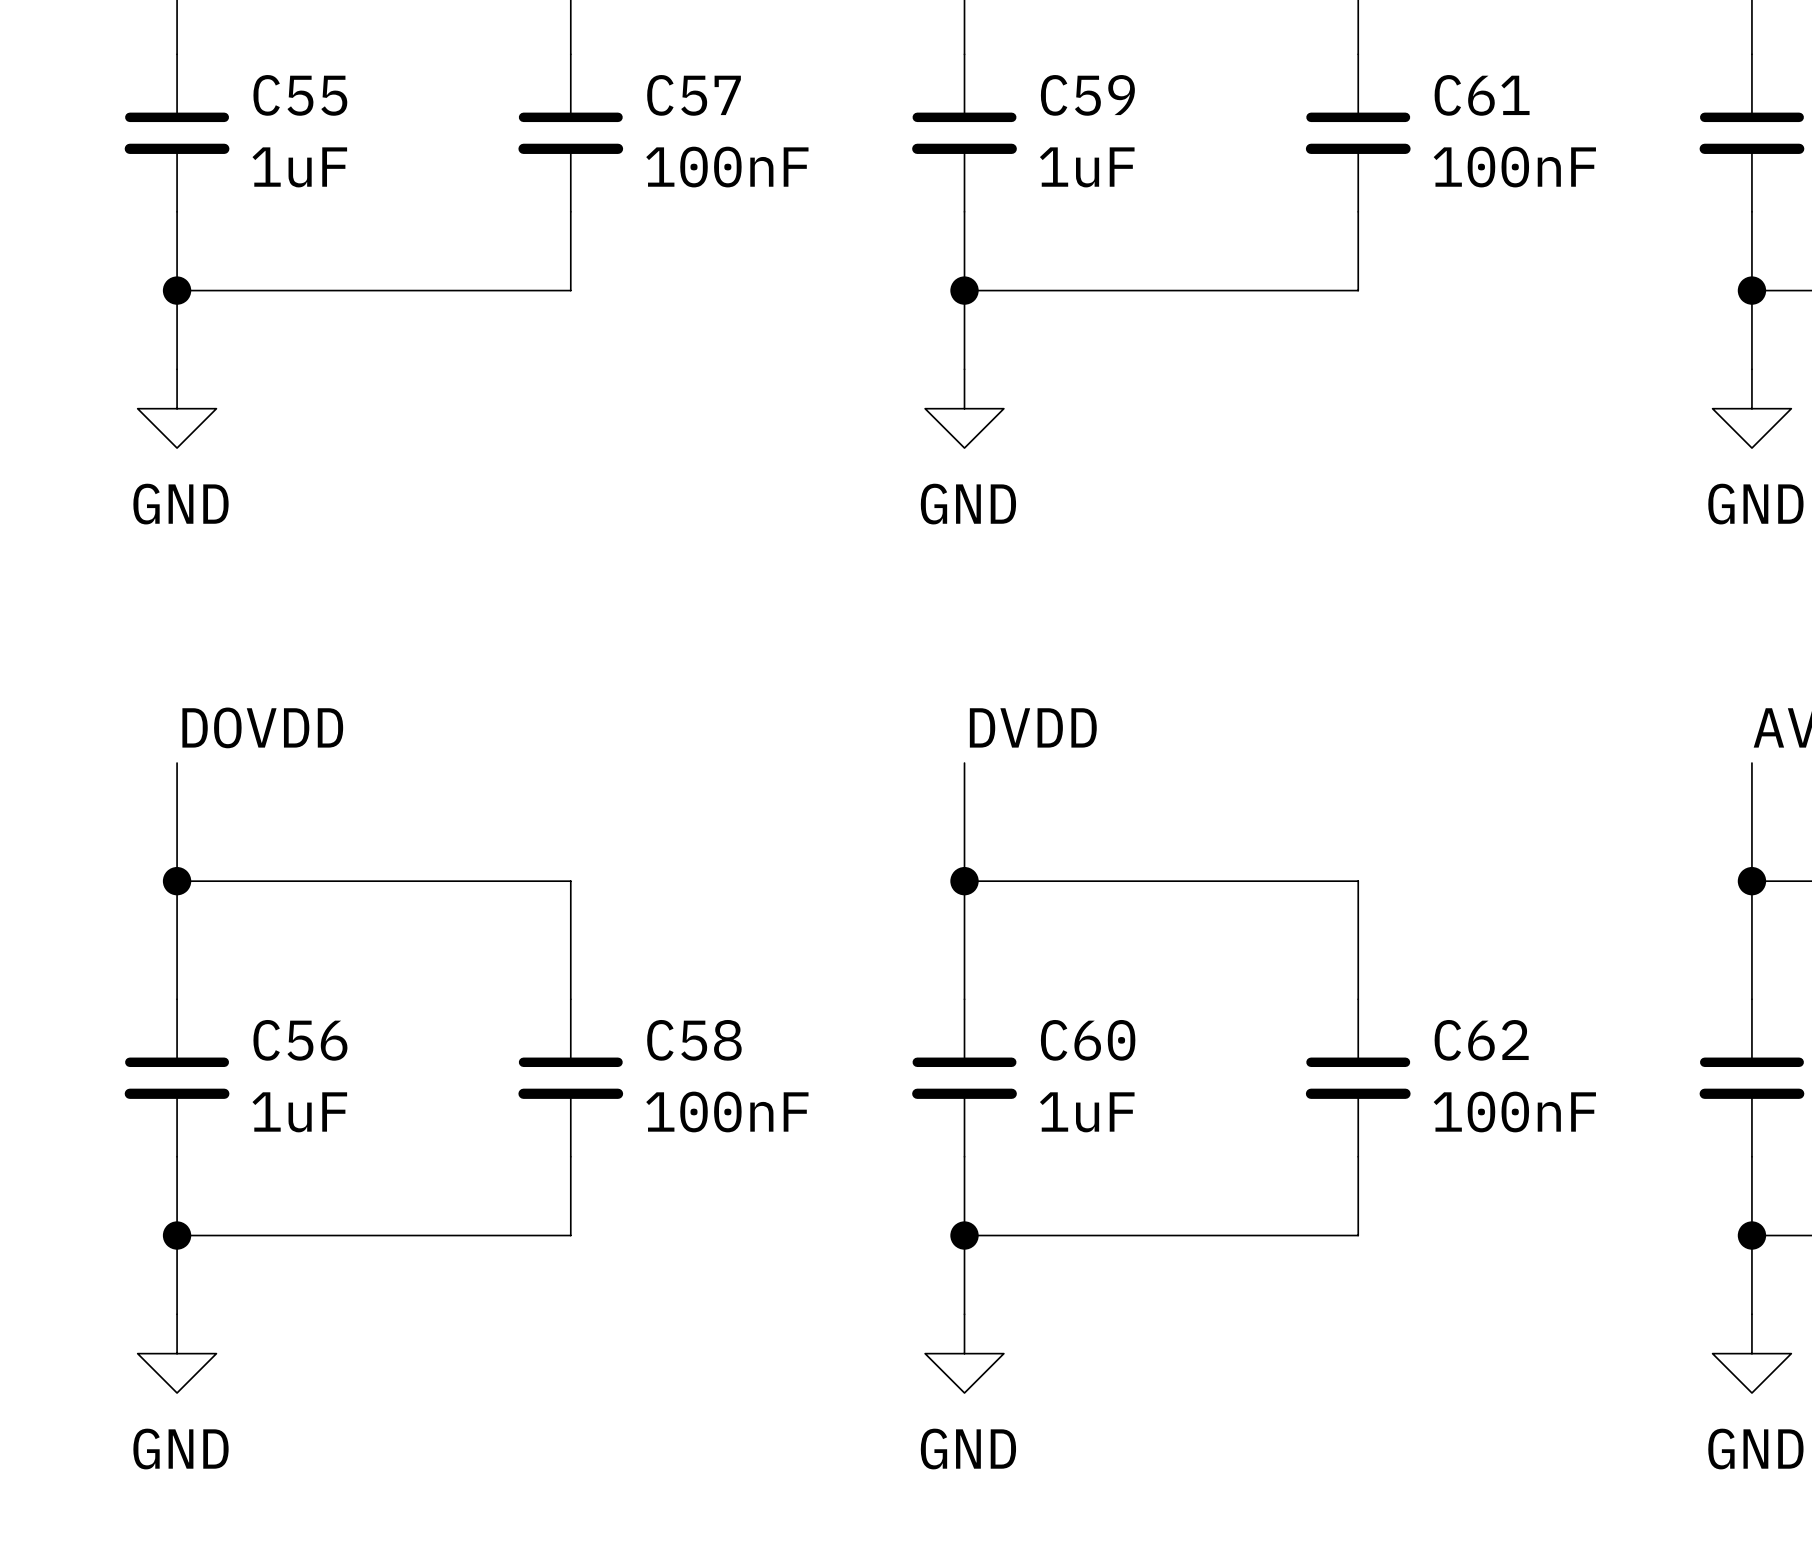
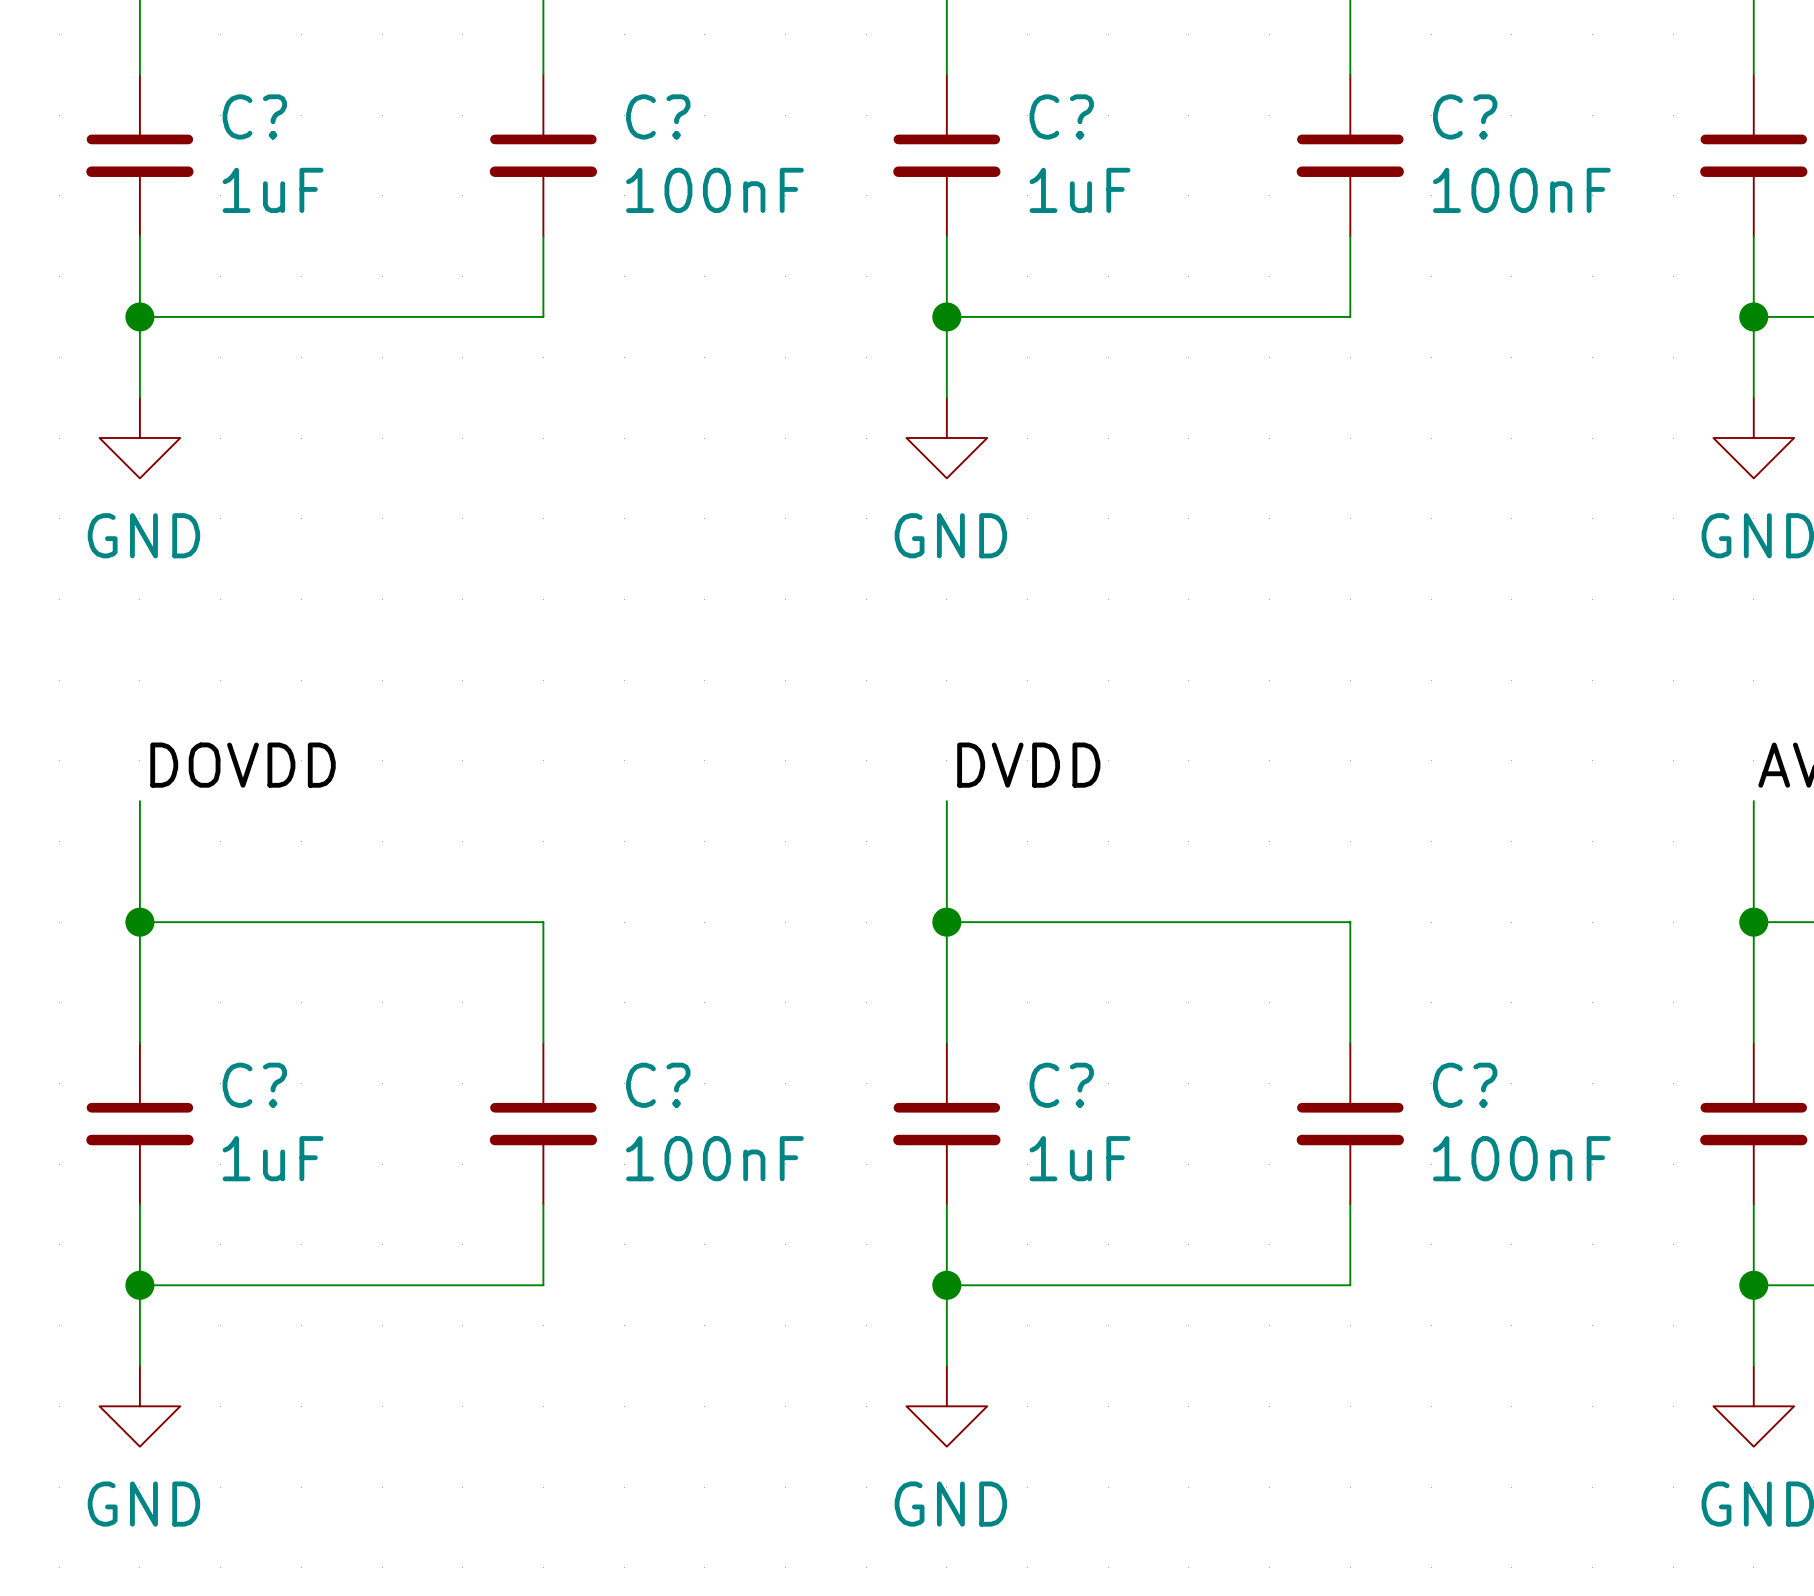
C55 name: C55 (300, 95) -> C? (254, 116)
C57 name: C57 (694, 95) -> C? (658, 116)
C59 name: C59 (1087, 95) -> C? (1061, 116)
C61 name: C61 (1482, 95) -> C? (1465, 116)
C56 name: C56 (300, 1040) -> C? (254, 1085)
C58 name: C58 (694, 1040) -> C? (658, 1085)
C60 name: C60 (1088, 1040) -> C? (1061, 1085)
C62 name: C62 (1481, 1040) -> C? (1465, 1085)

